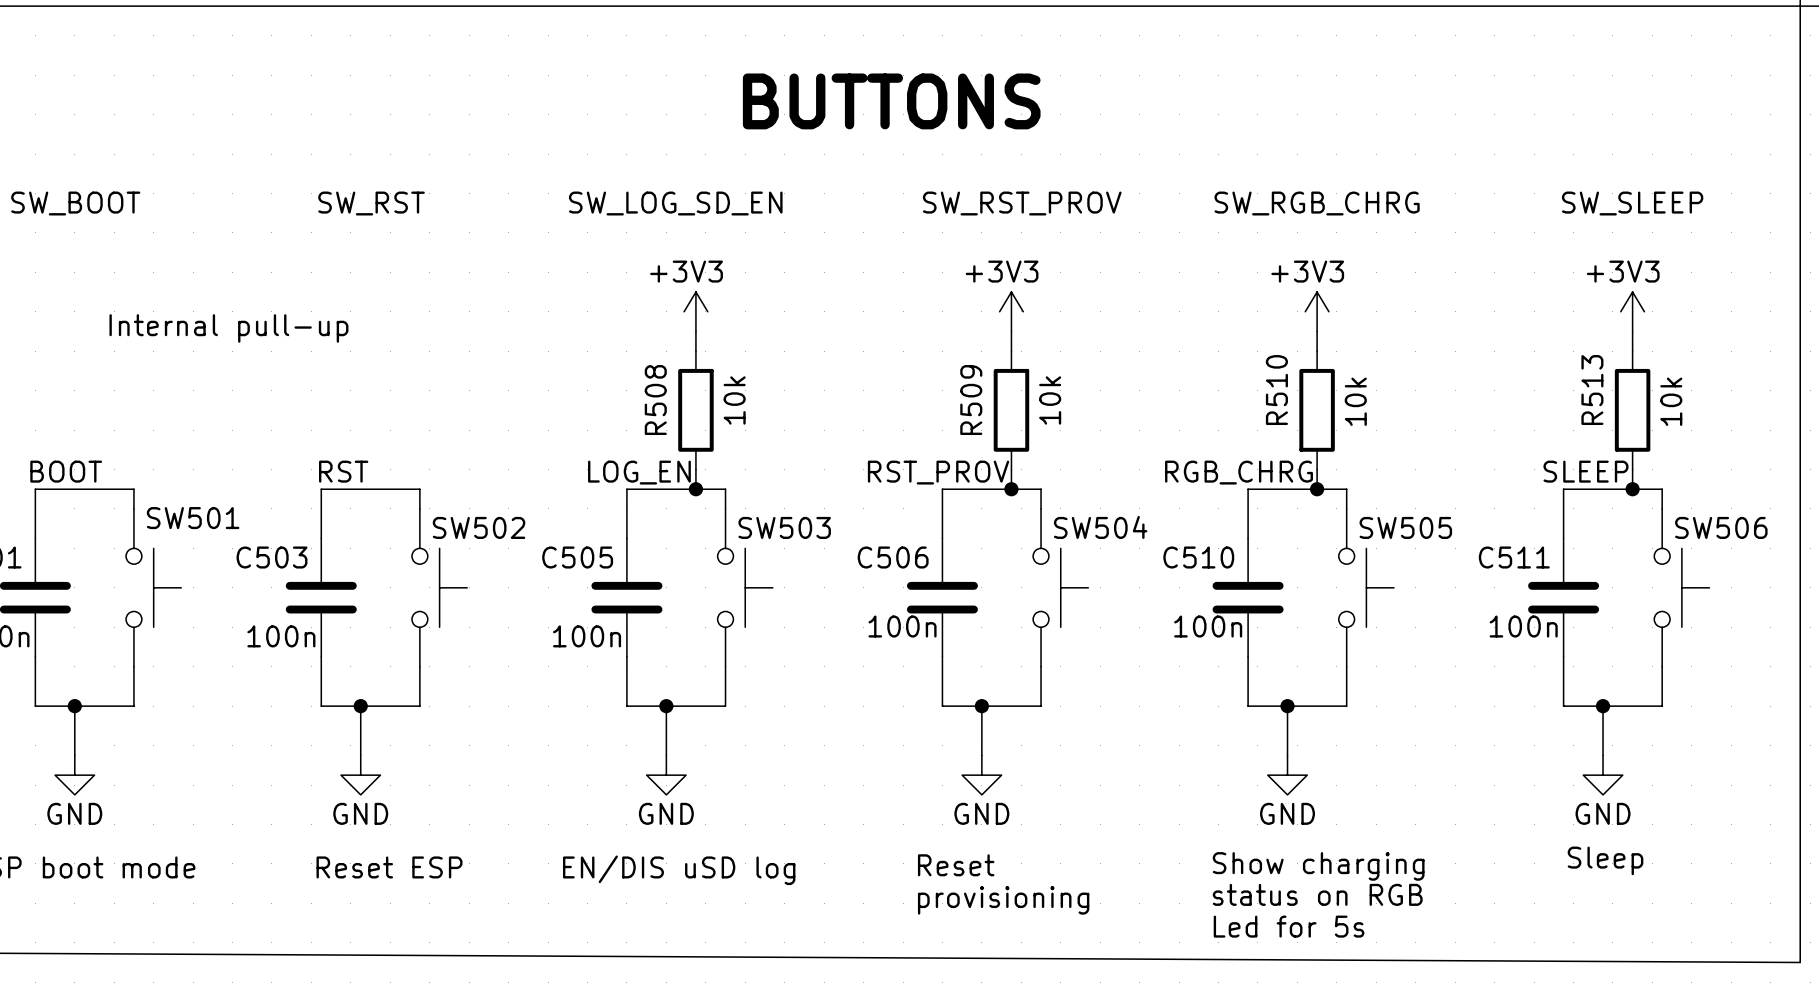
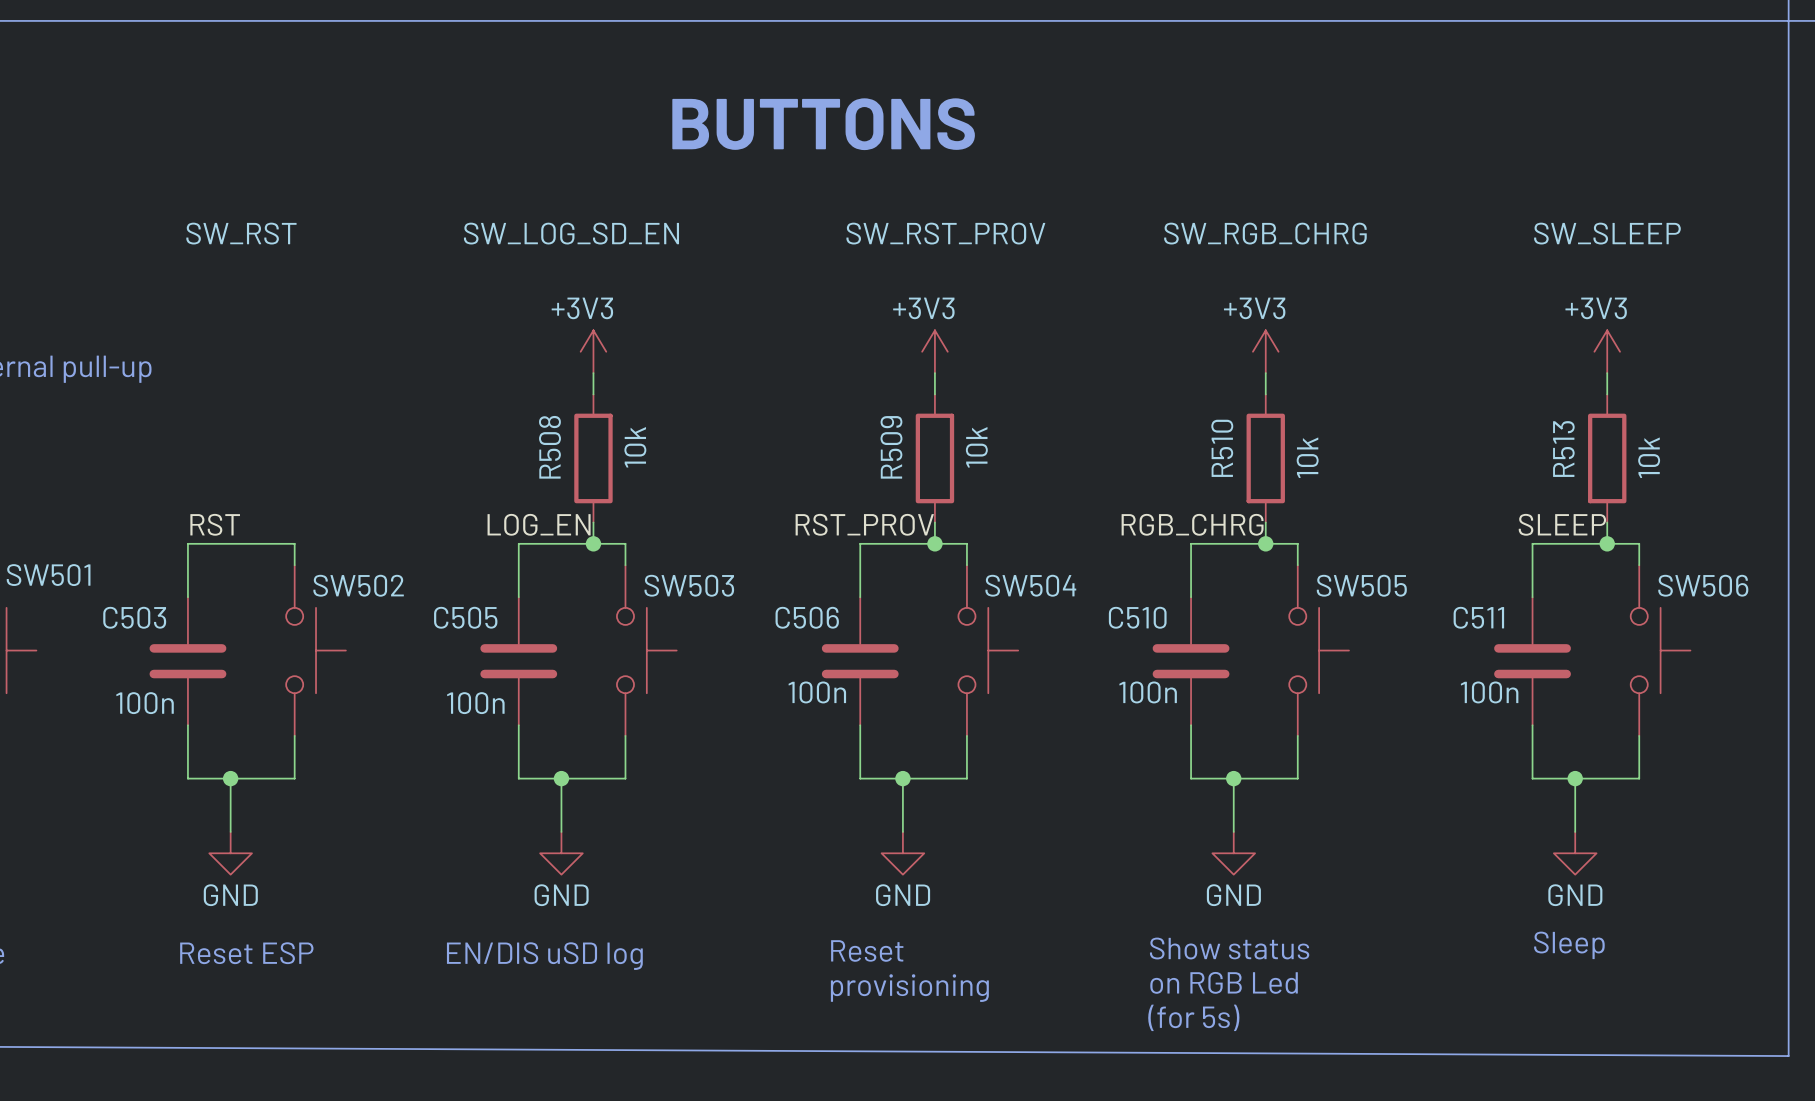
text: Show charging (1318, 866) -> Show status (1229, 948)
text: status on RGB (1317, 894) -> on RGB Led (1224, 982)
text: Led for 5s (1289, 926) -> (for 5s) (1193, 1017)

